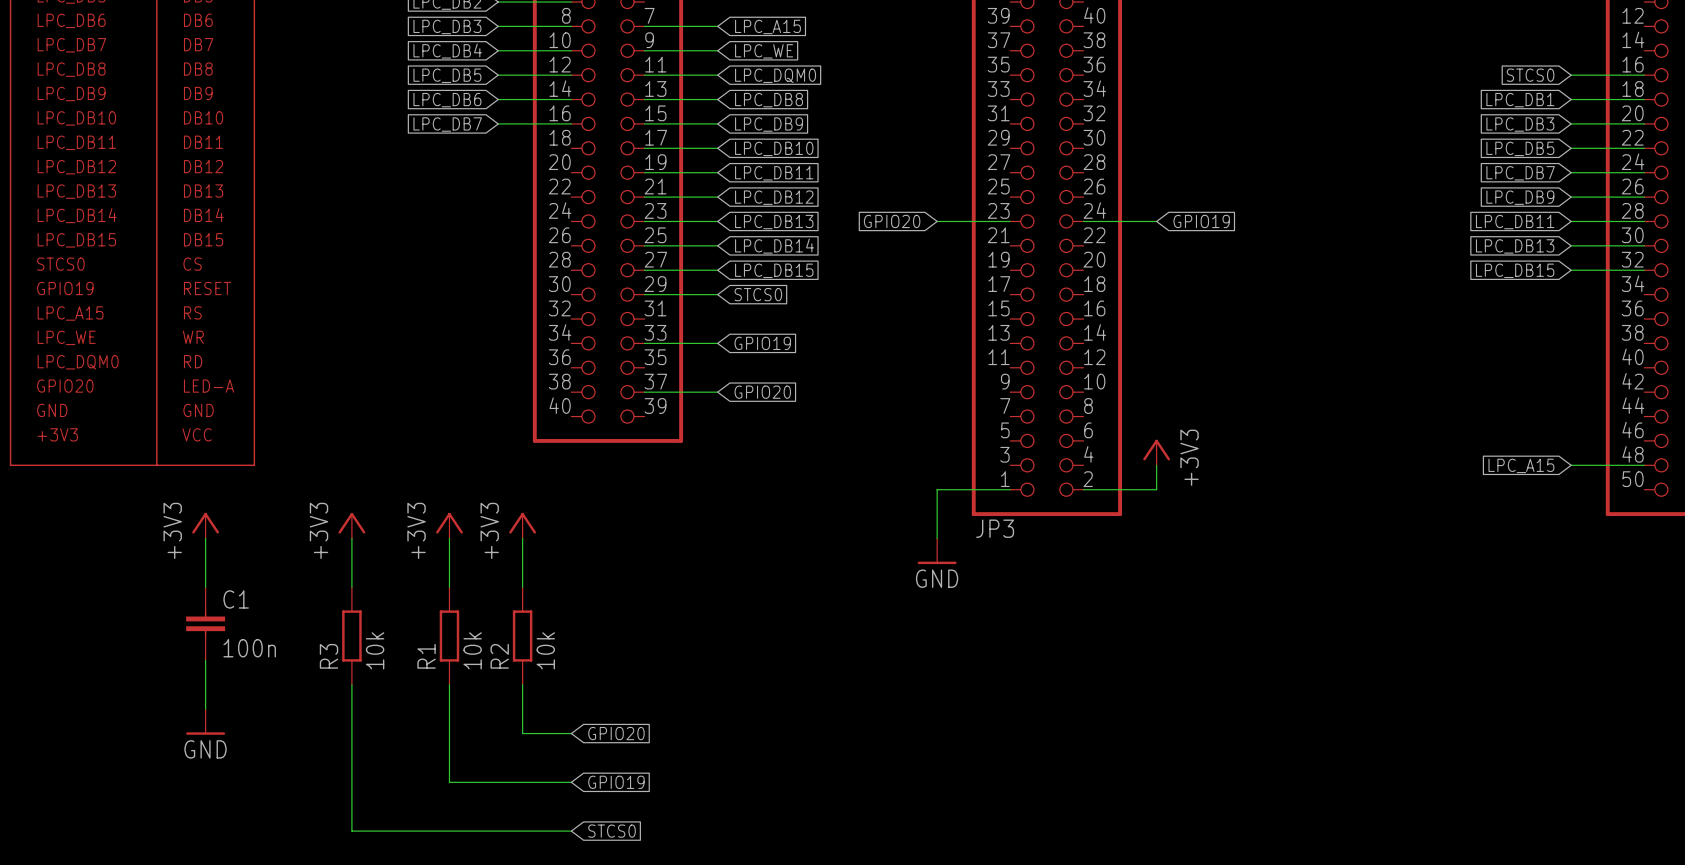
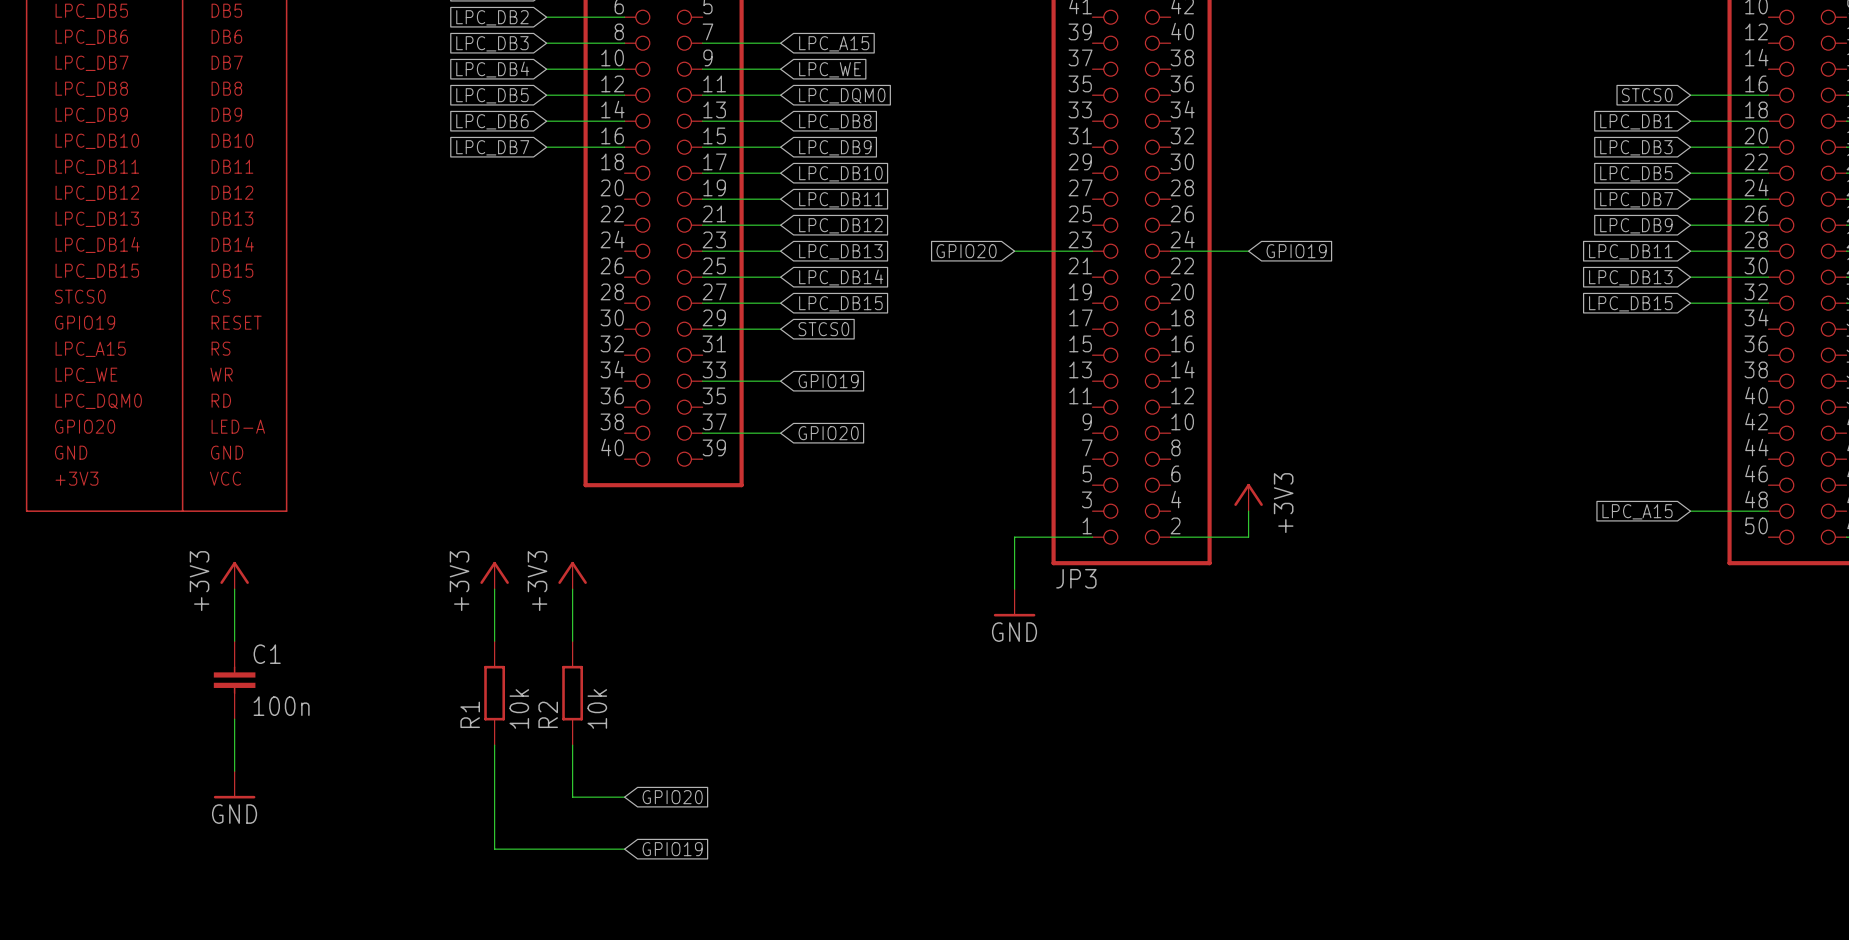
power symbol: +3V3 (351, 525) -> none
wire: (351, 538) (351, 587) -> none
R3: 10k (351, 636) -> none
wire: (351, 684) (351, 831) (571, 831) -> none
global label: STCS0 (612, 831) -> none

